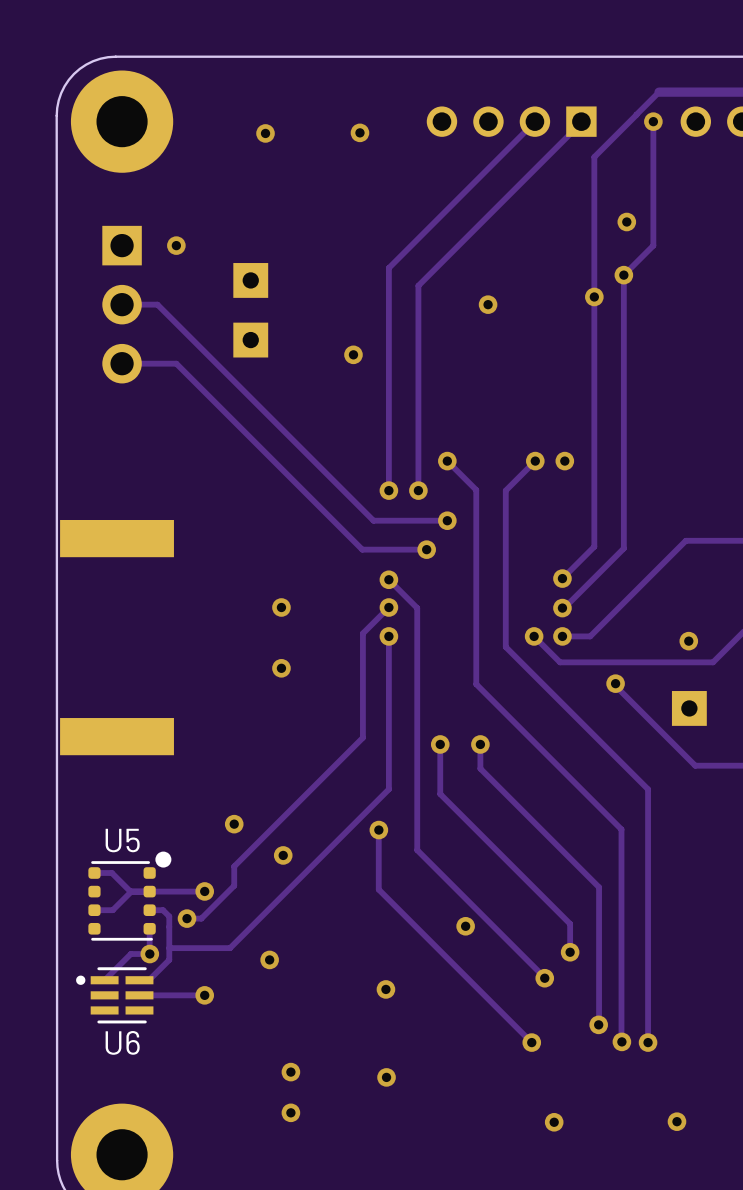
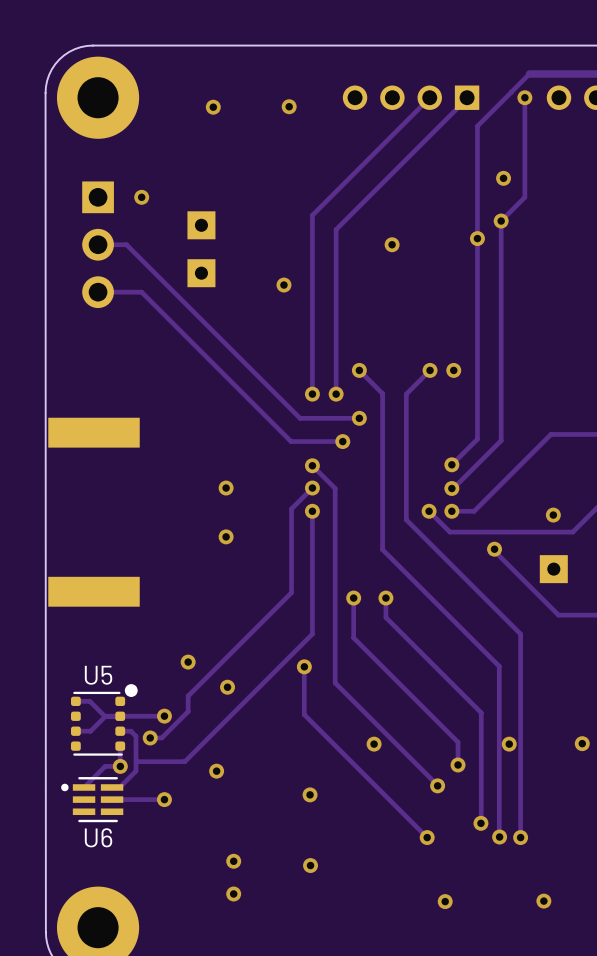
via: none -> (582, 743)
via: none -> (509, 744)

